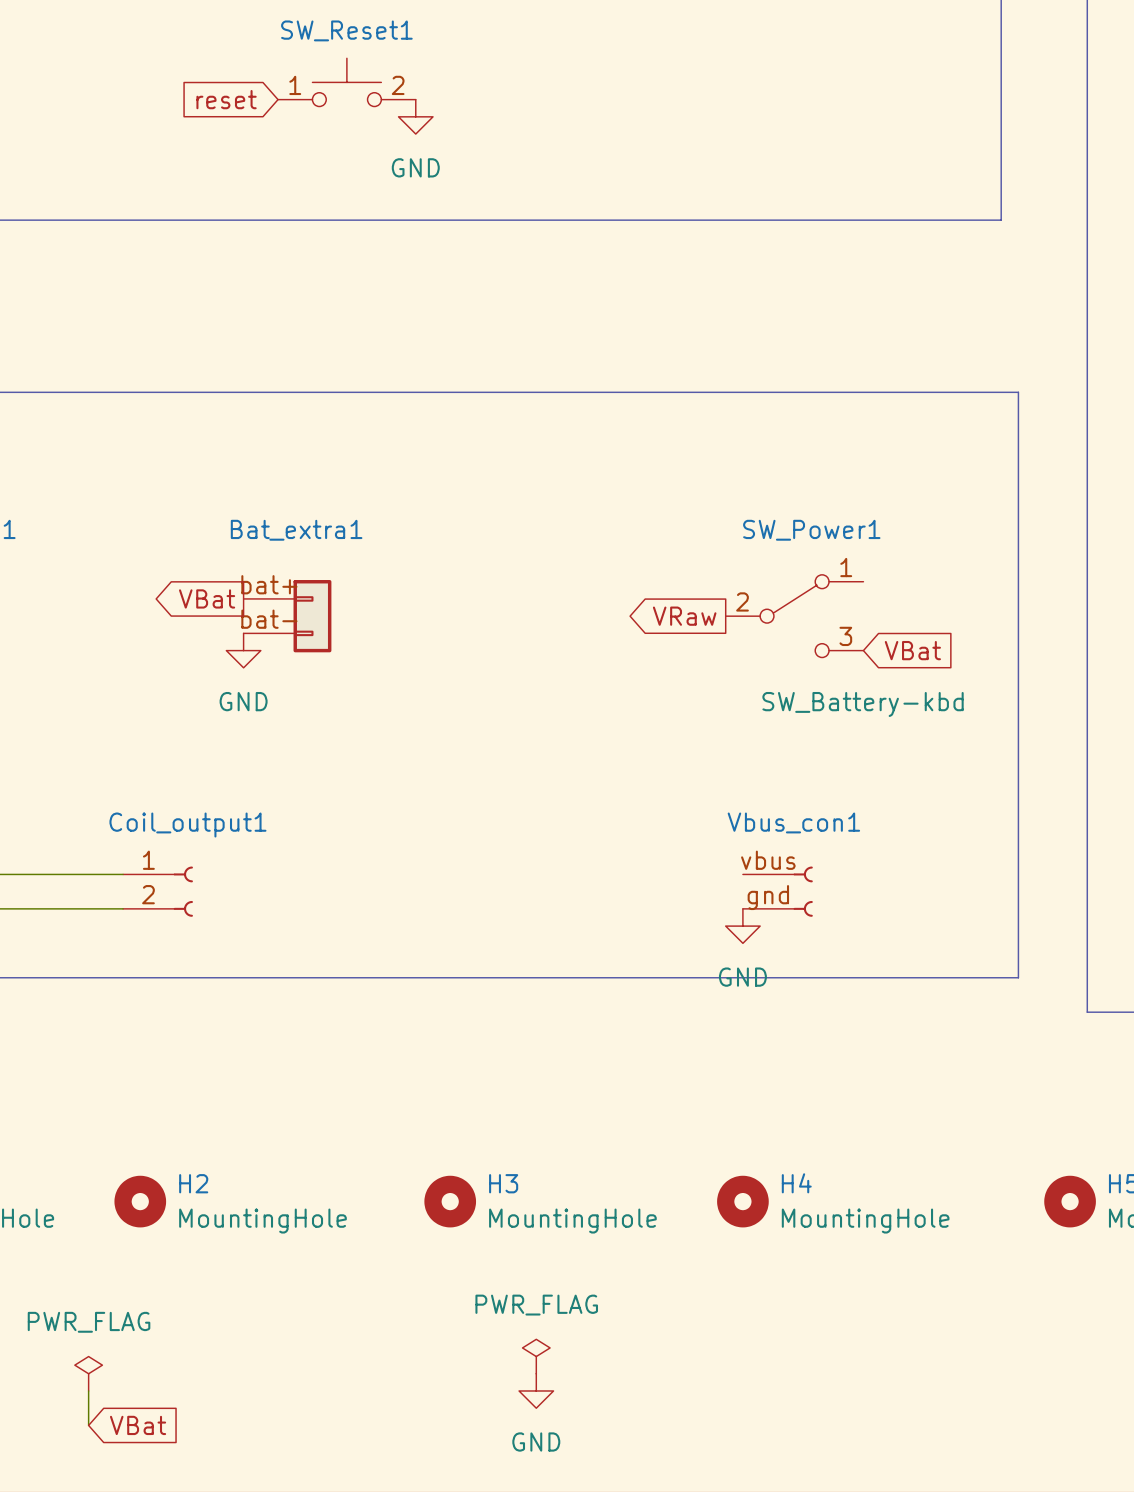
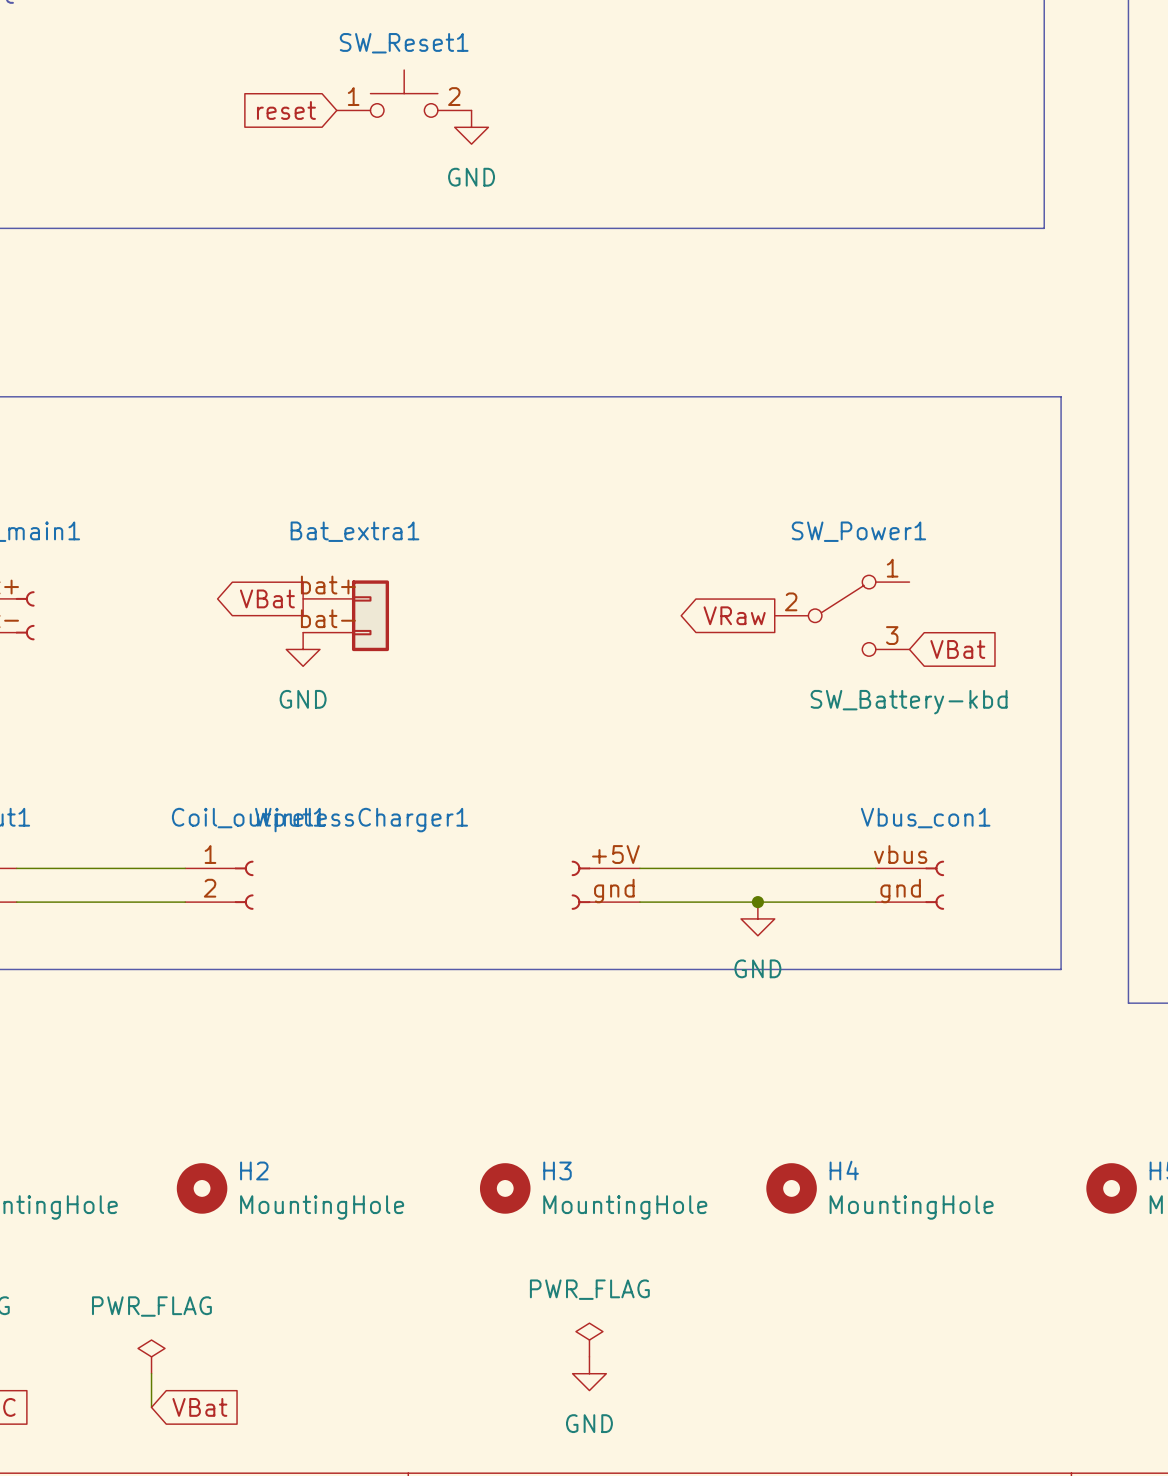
wire: none -> (639, 868) (875, 868)
WirelessCharger1: none -> (605, 885)
Vbus_con1 position: (777, 891) -> (909, 885)
wire: none -> (639, 902) (875, 902)
junction: none -> (757, 902)
power symbol position: GND (742, 926) -> GND (757, 918)

